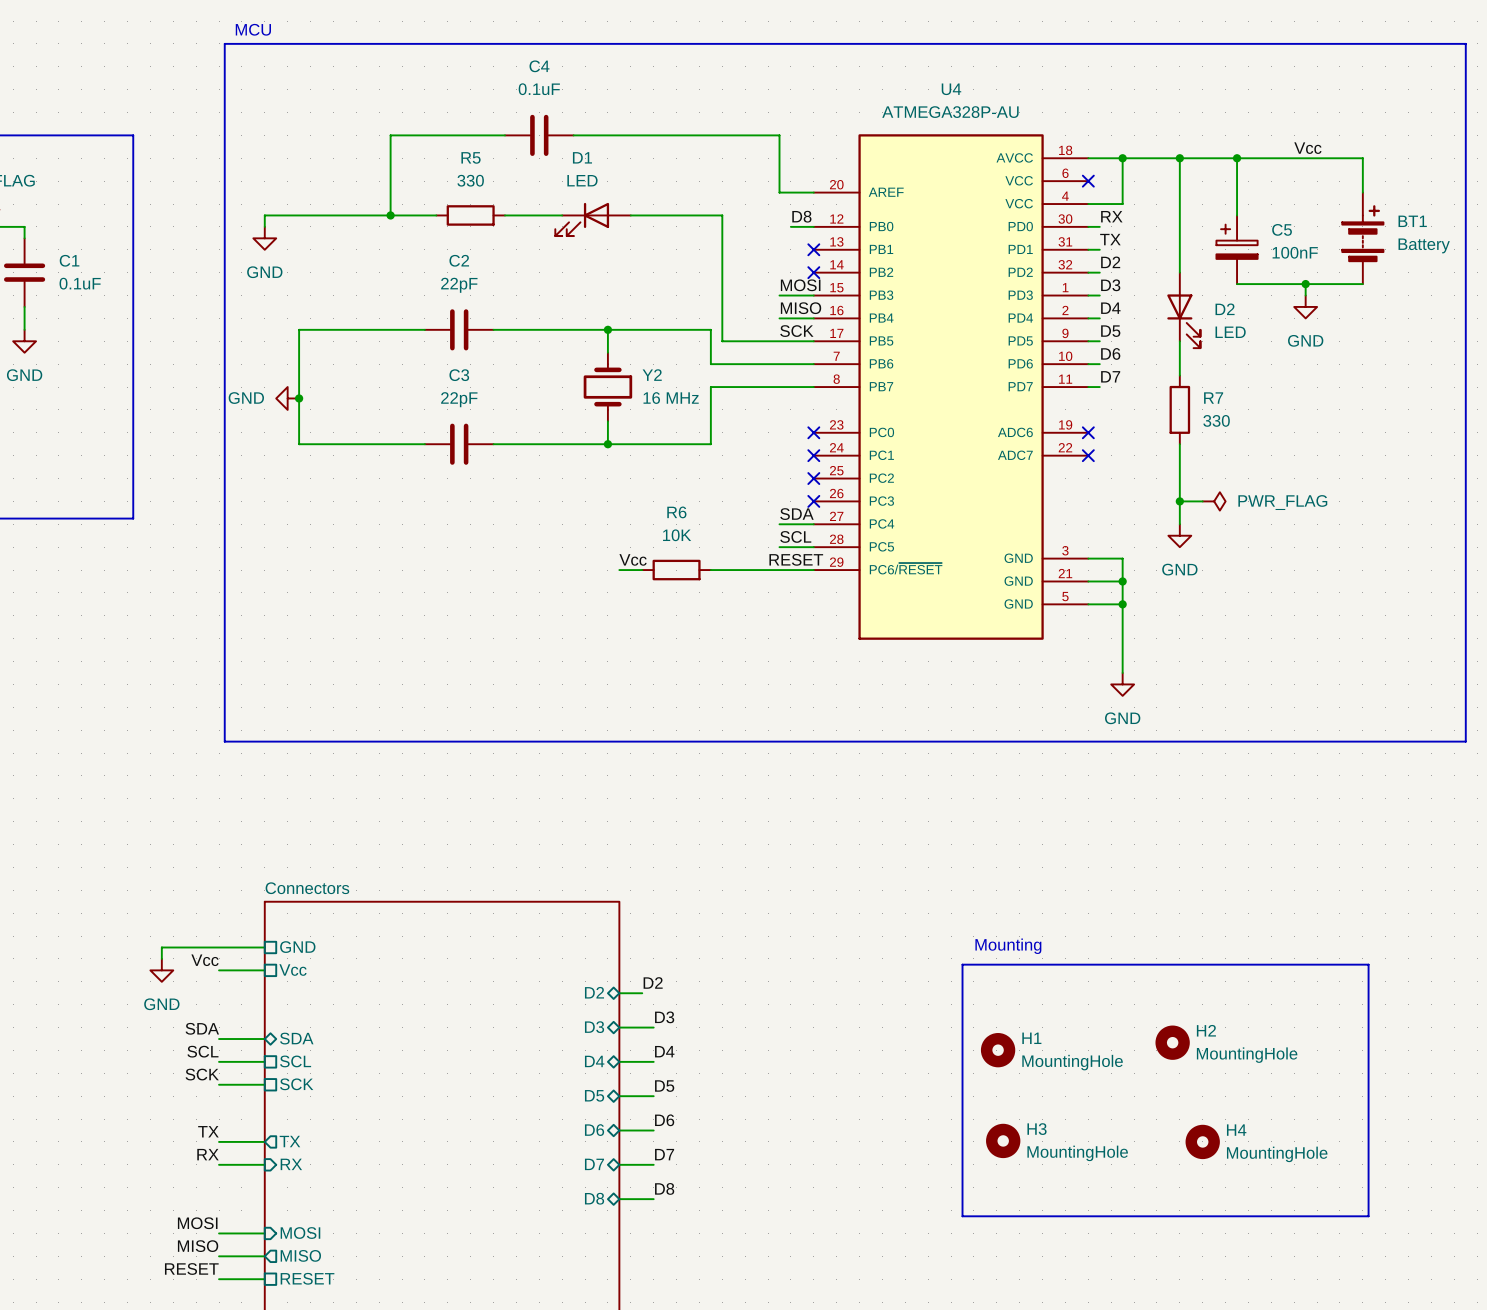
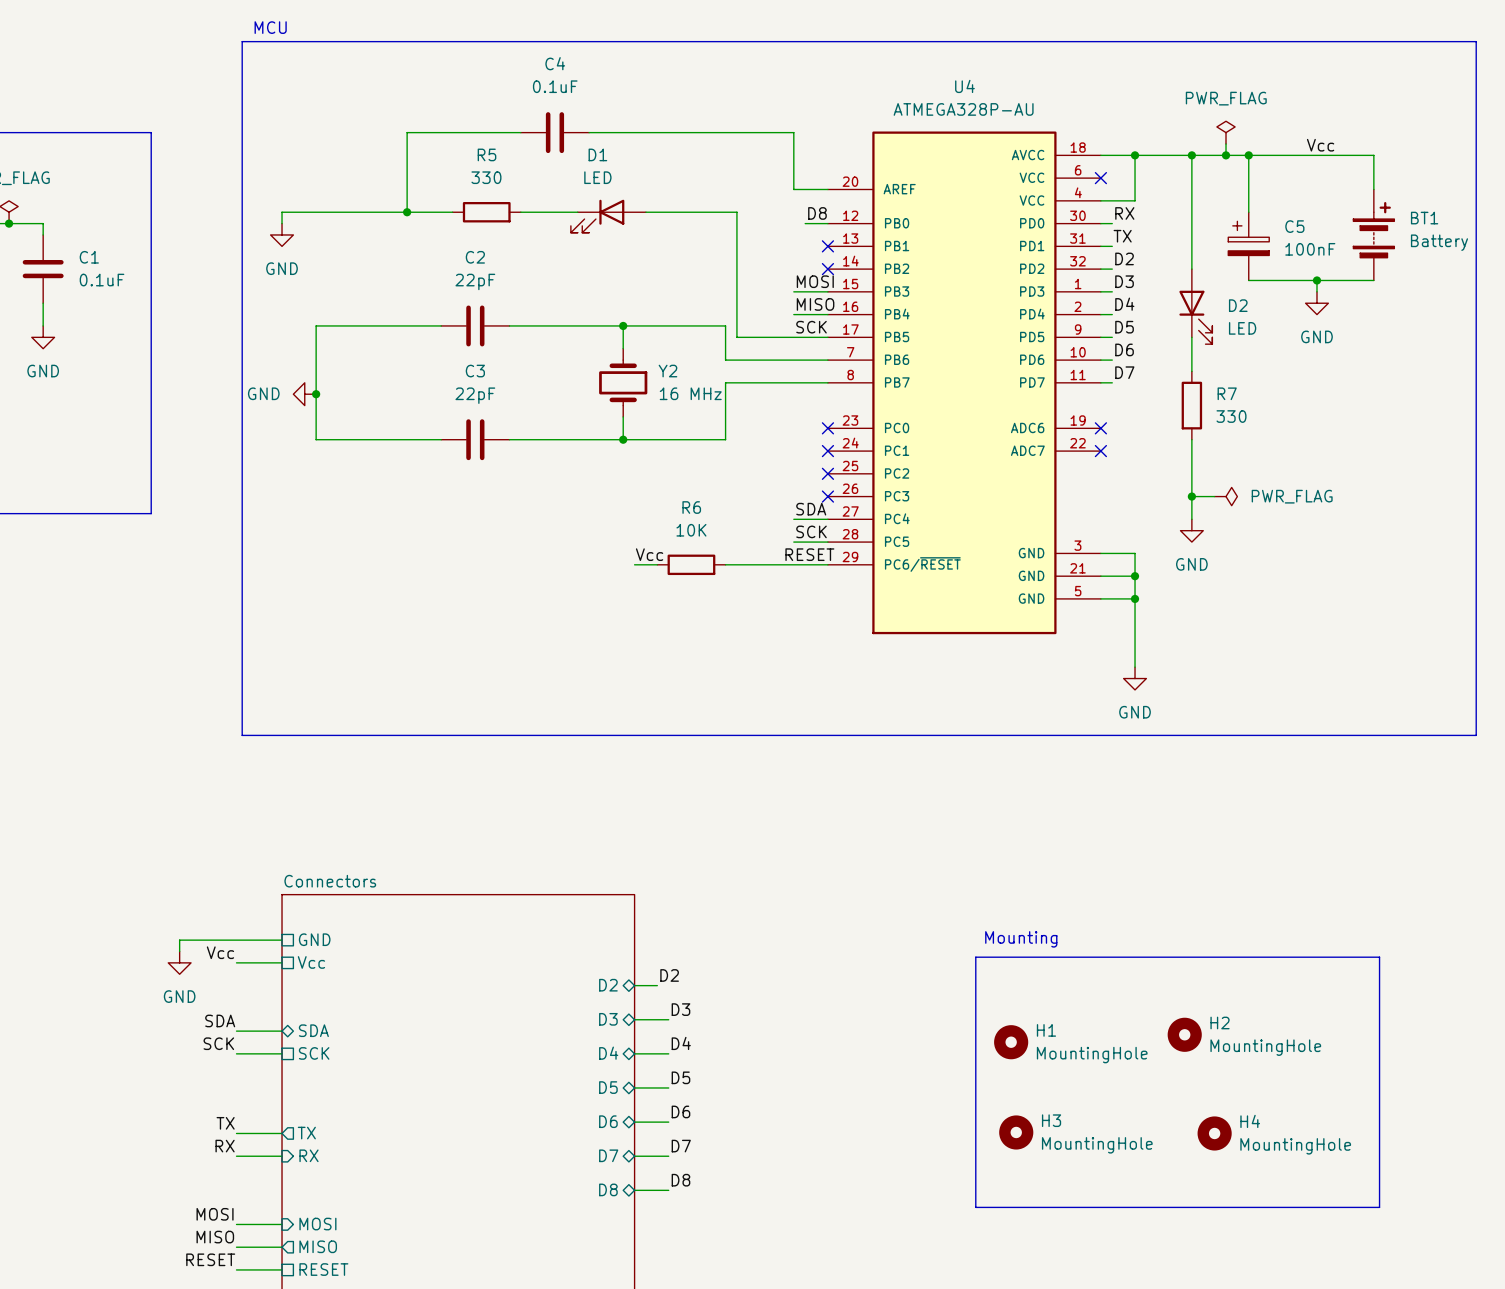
power symbol: none -> PWR_FLAG (1226, 132)
wire: none -> (1226, 143) (1226, 155)
junction: none -> (1226, 155)
label: SCL (795, 536) -> SCK (811, 531)
label: SCL (202, 1051) -> SCK (218, 1043)
sheet pin: SCL (295, 1061) -> SCK (314, 1053)
label: SCK (202, 1074) -> none
wire: (219, 1084) (264, 1084) -> none
sheet pin: SCK (296, 1084) -> none

